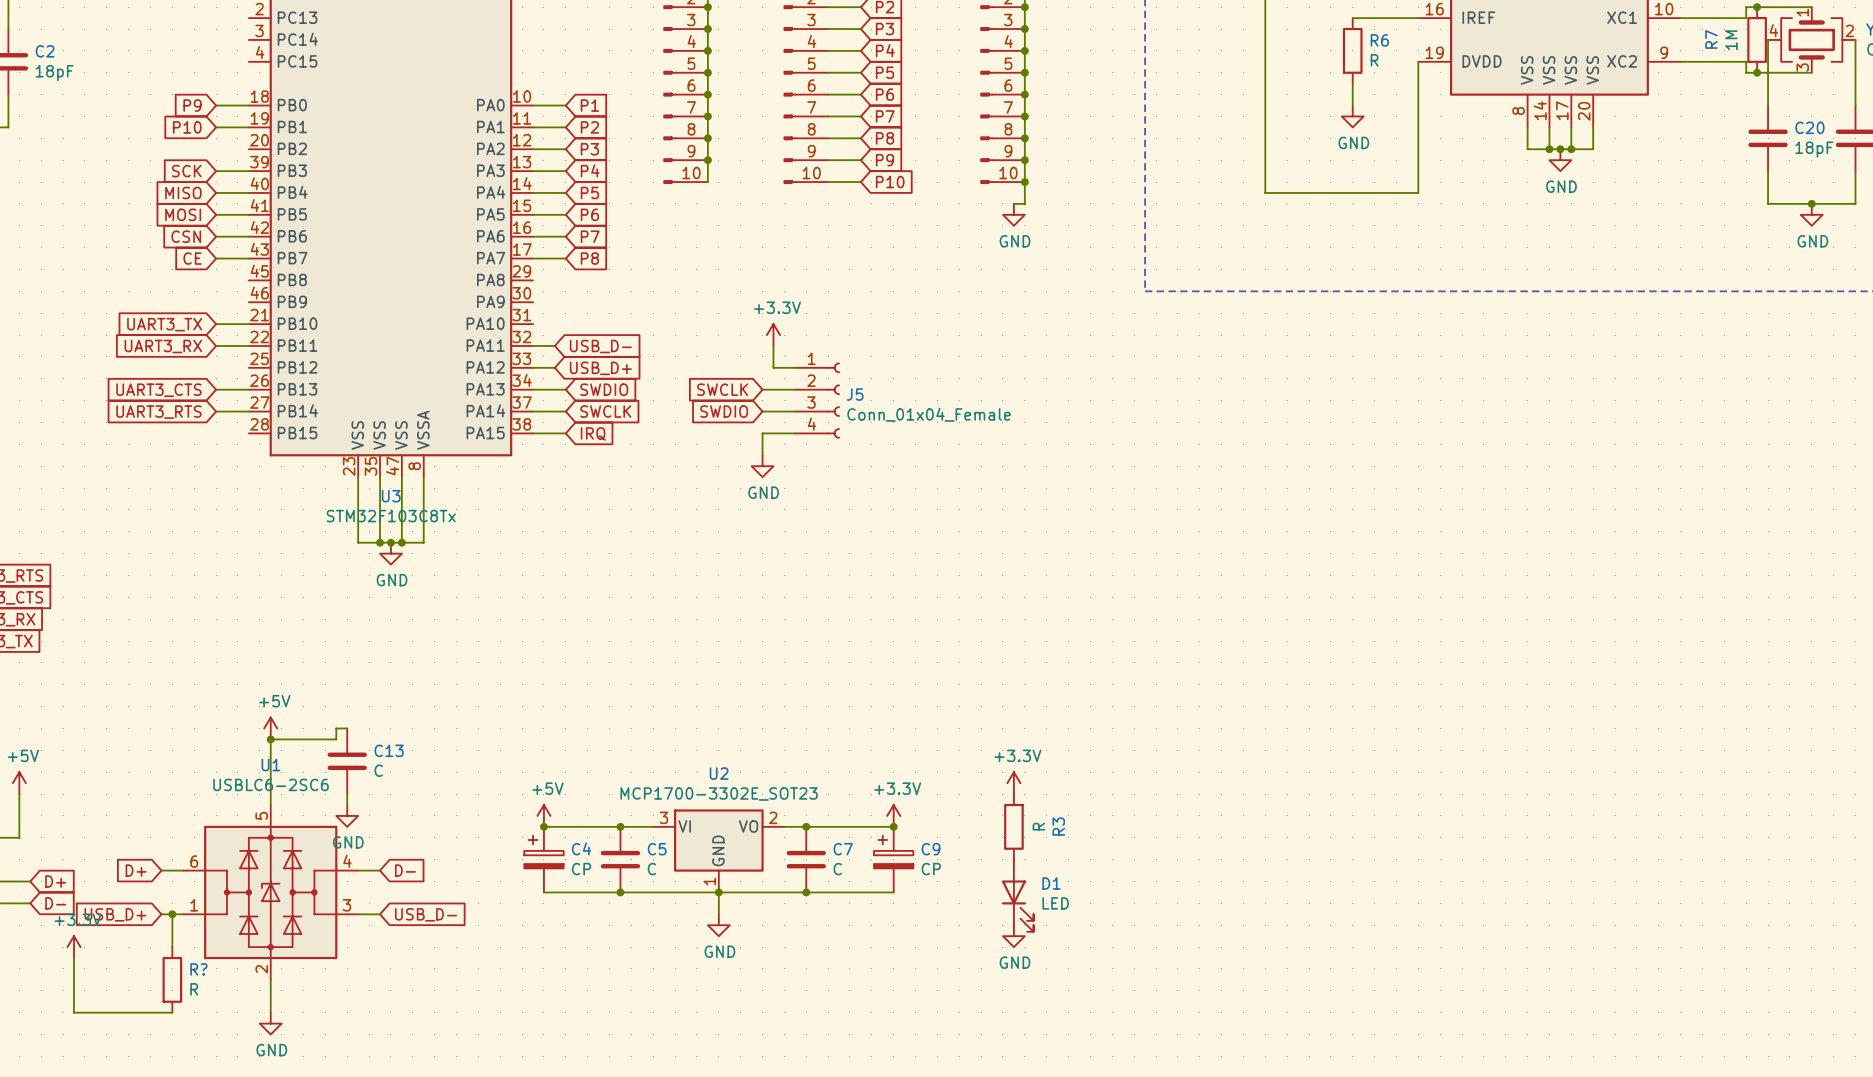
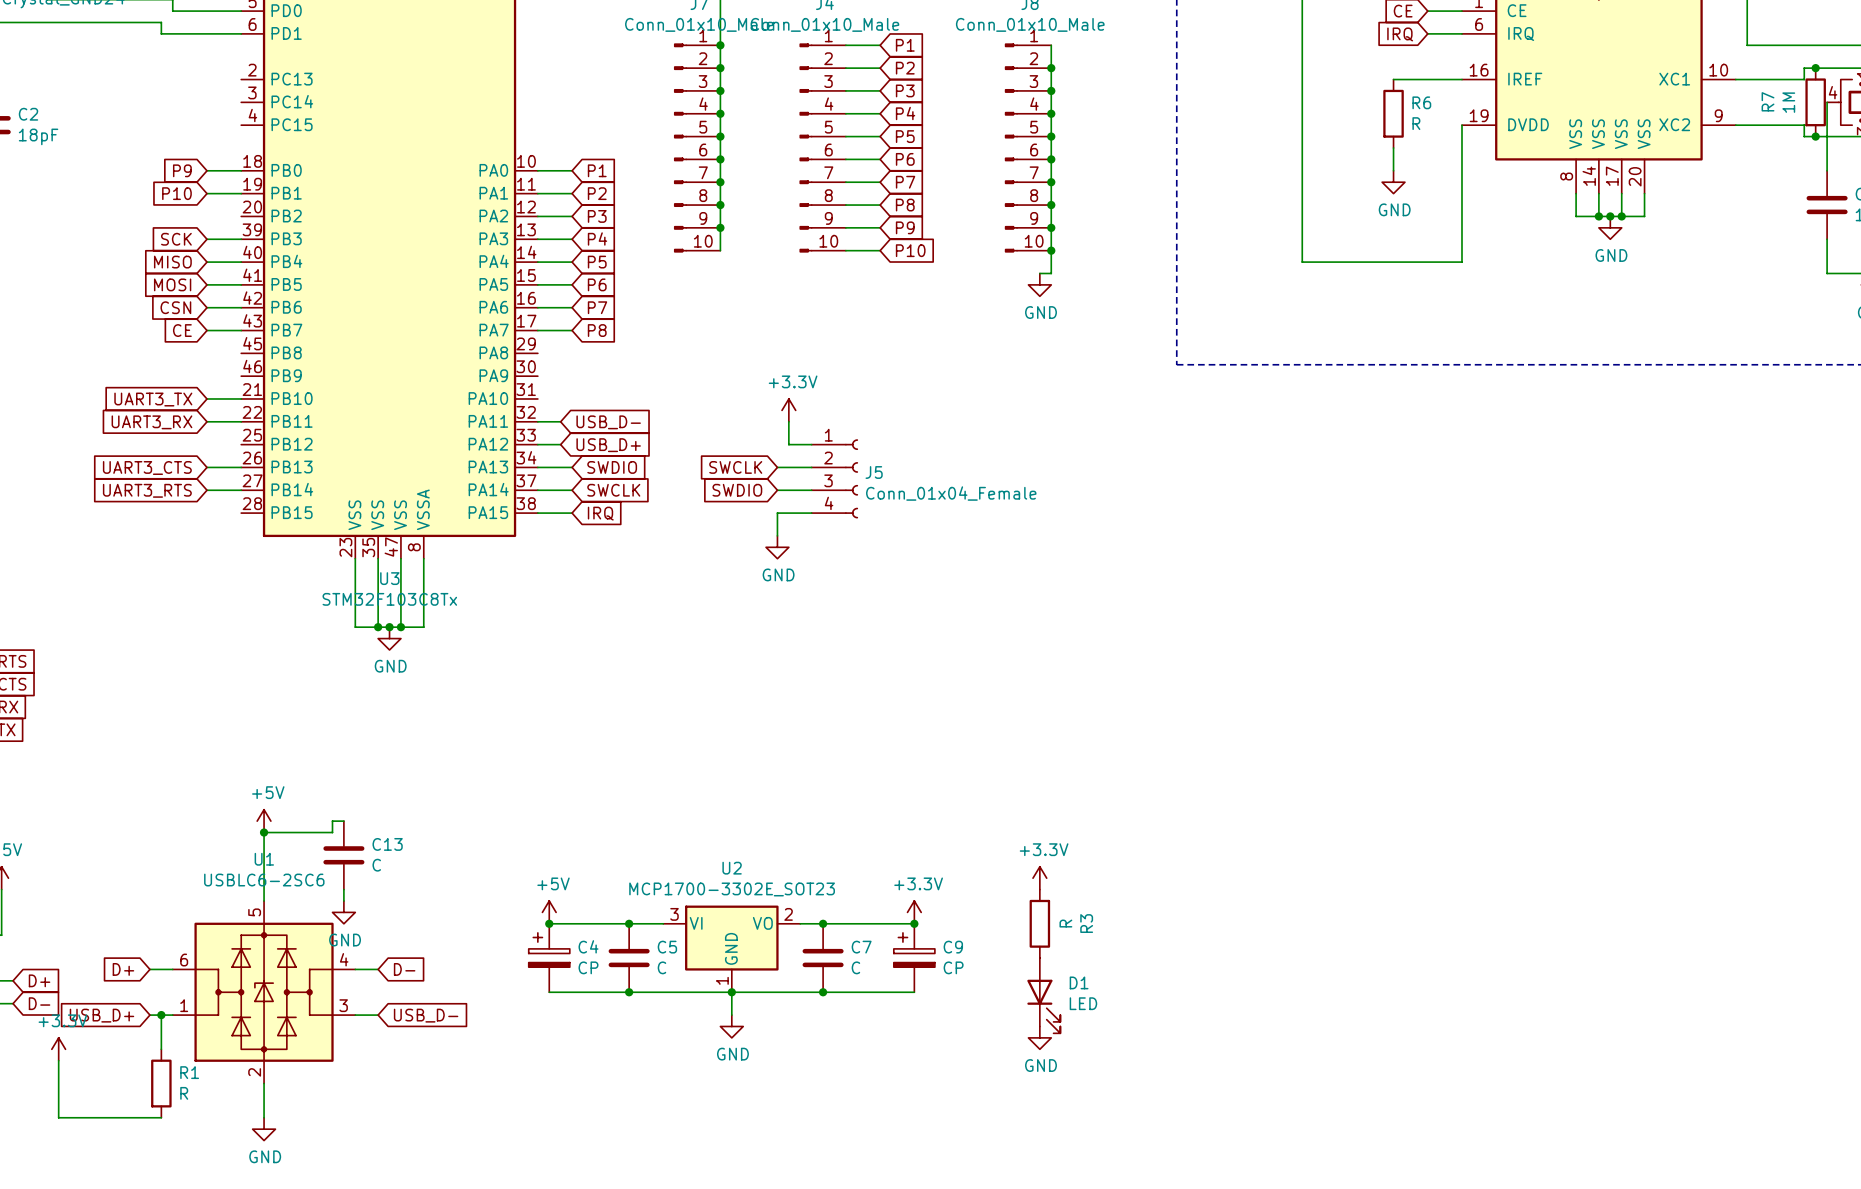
R? name: R? (198, 969) -> R1 (189, 1072)

